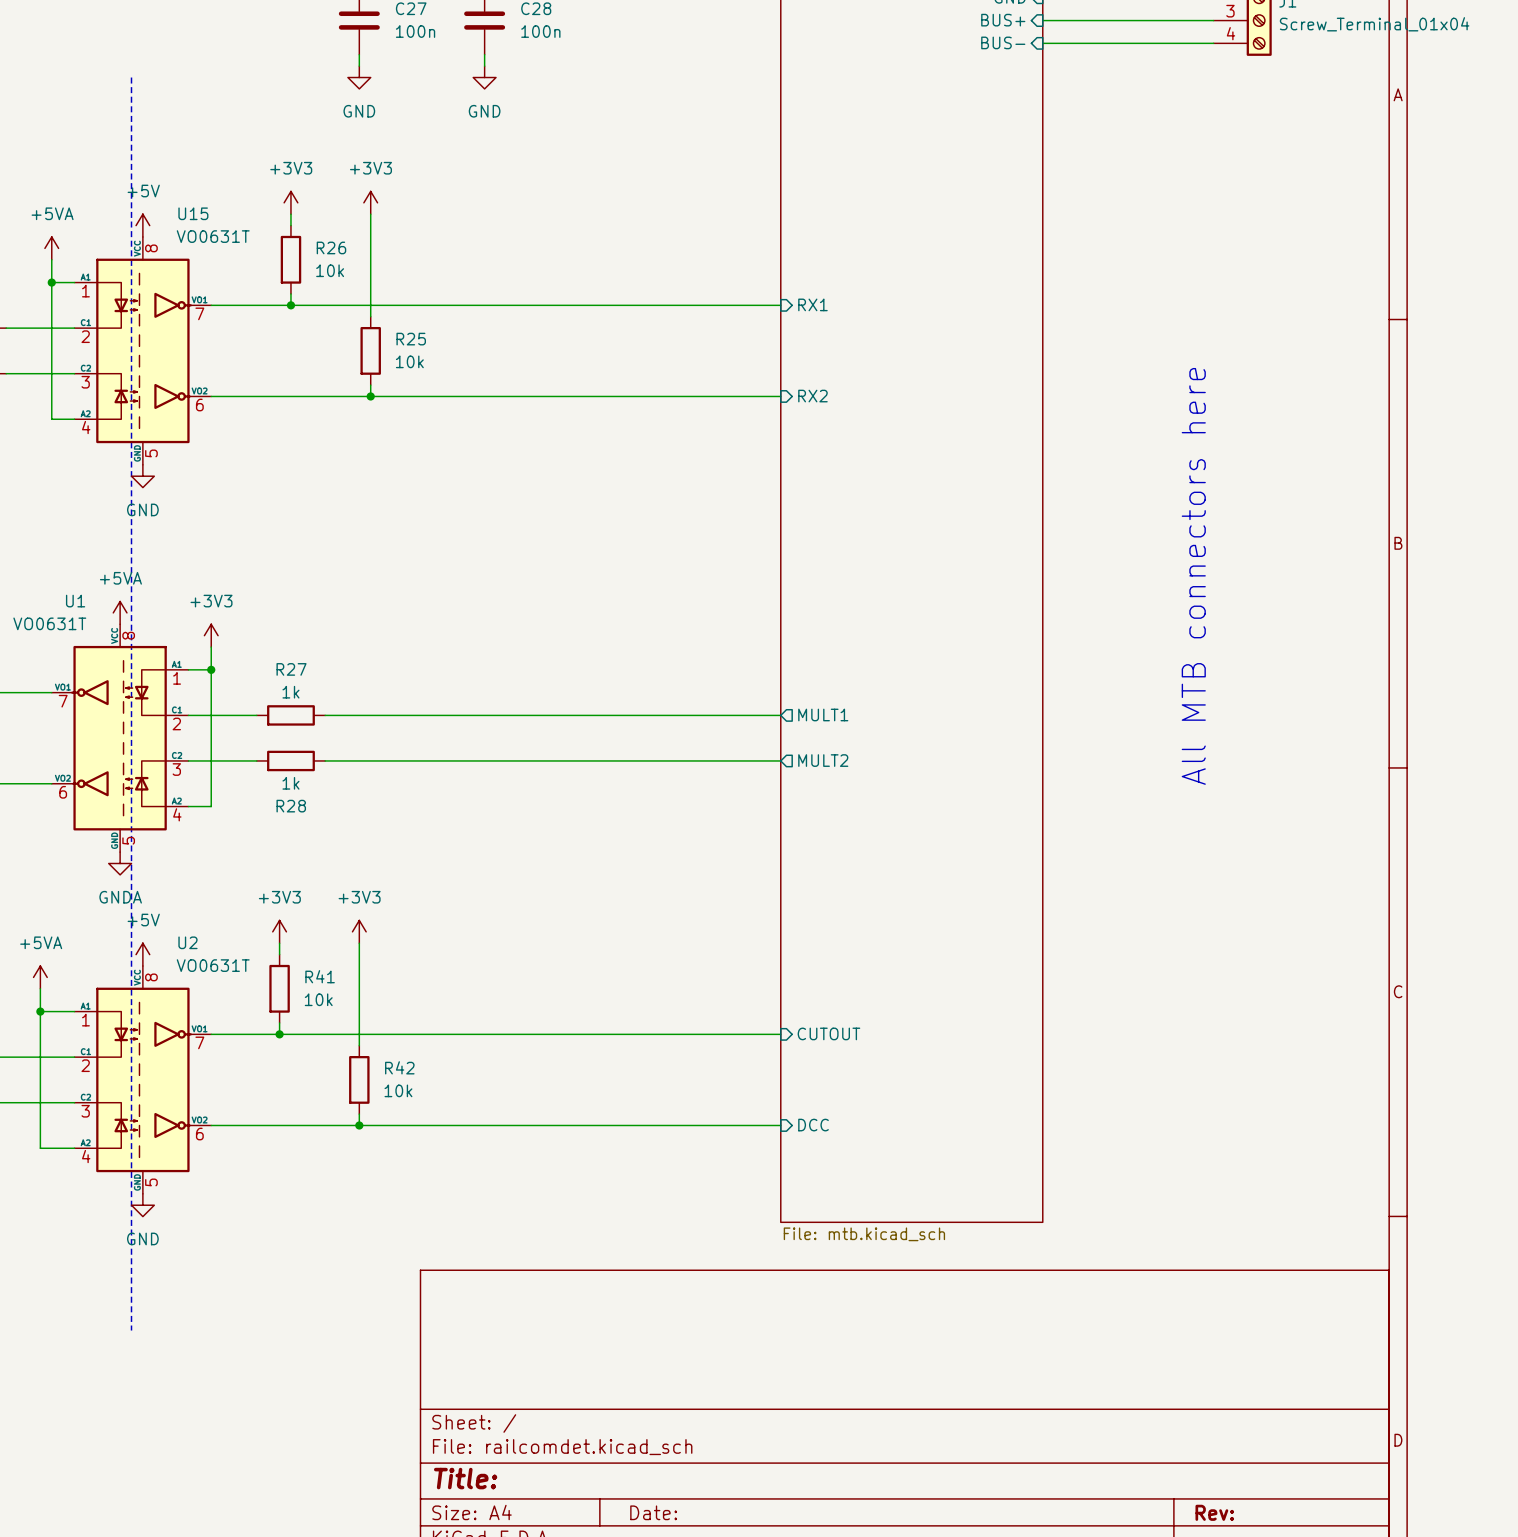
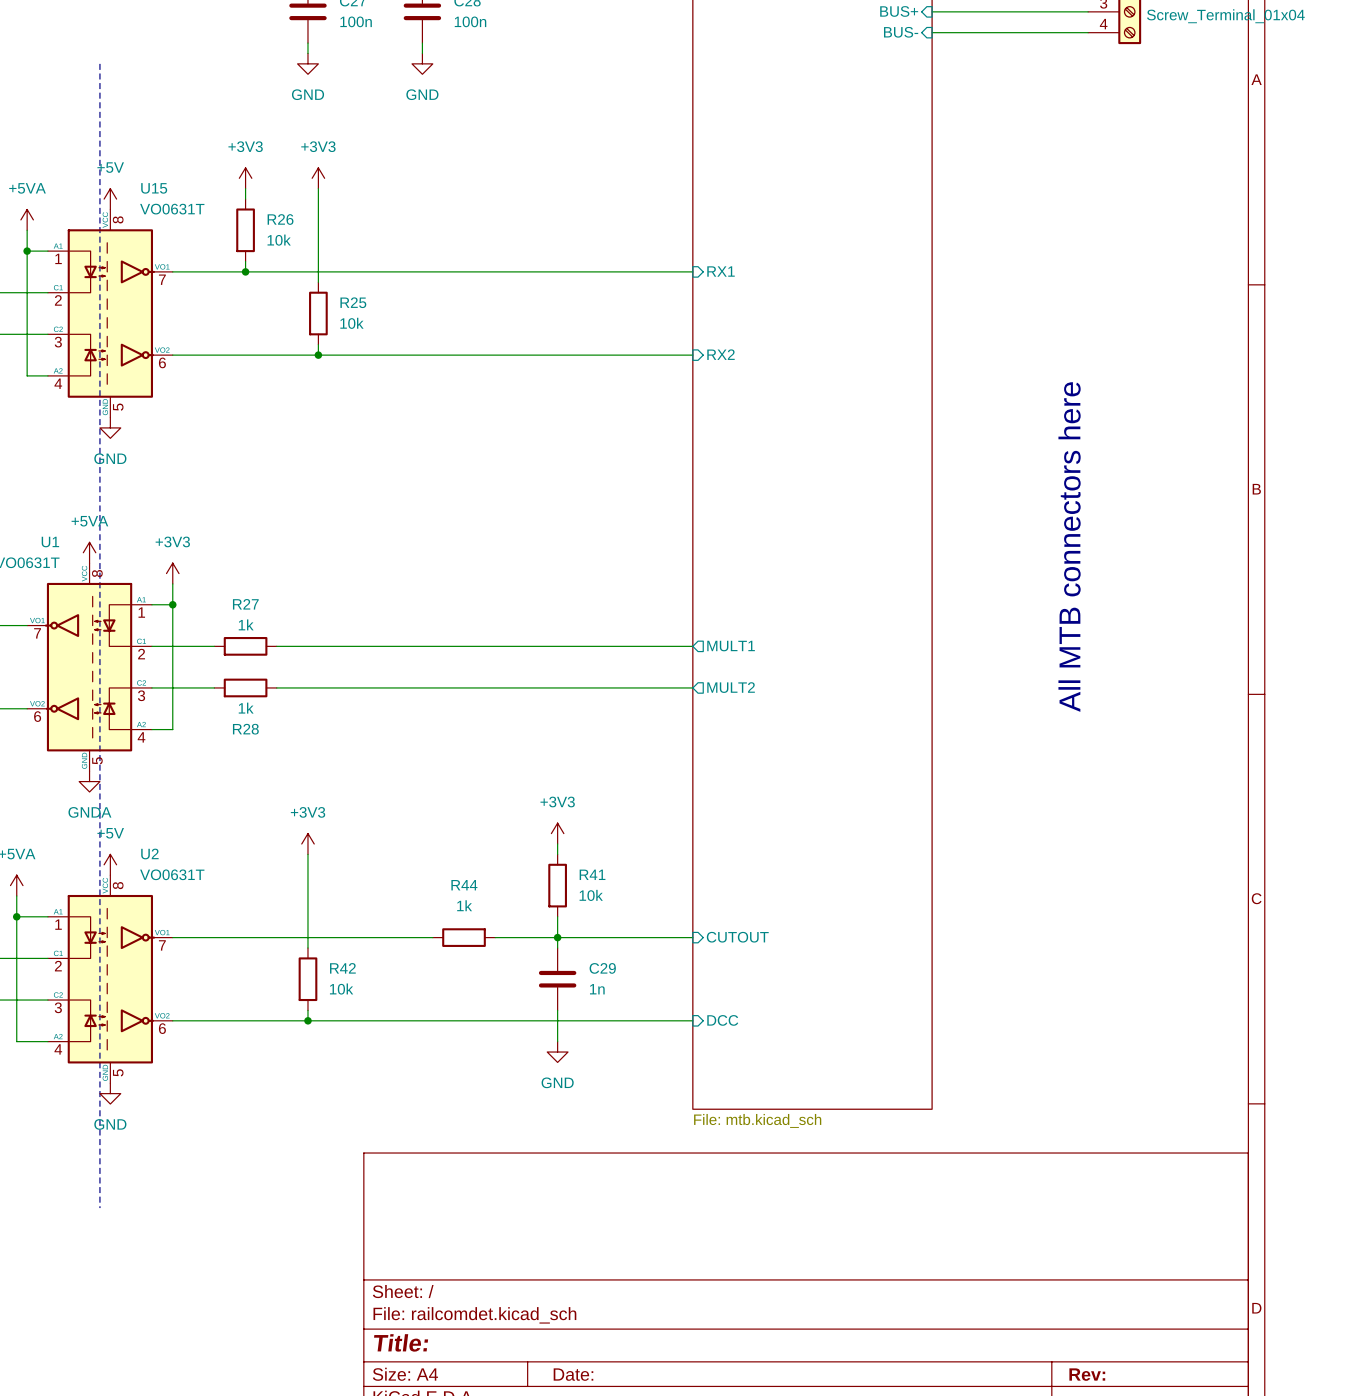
power symbol: none -> +3V3 (557, 833)
power symbol: +3V3 (279, 931) -> none
wire: none -> (557, 843) (557, 854)
wire: (279, 943) (279, 954) -> none
R41 position: (279, 988) -> (557, 885)
wire: none -> (557, 916) (557, 948)
wire: (279, 1022) (279, 1034) -> none
junction: (279, 1034) -> none
wire: (496, 1034) (564, 1034) -> none
R44: none -> 1k (464, 937)
junction: none -> (557, 937)
C29: none -> 1n (557, 979)
wire: none -> (557, 1010) (557, 1041)
power symbol: none -> GND (557, 1052)

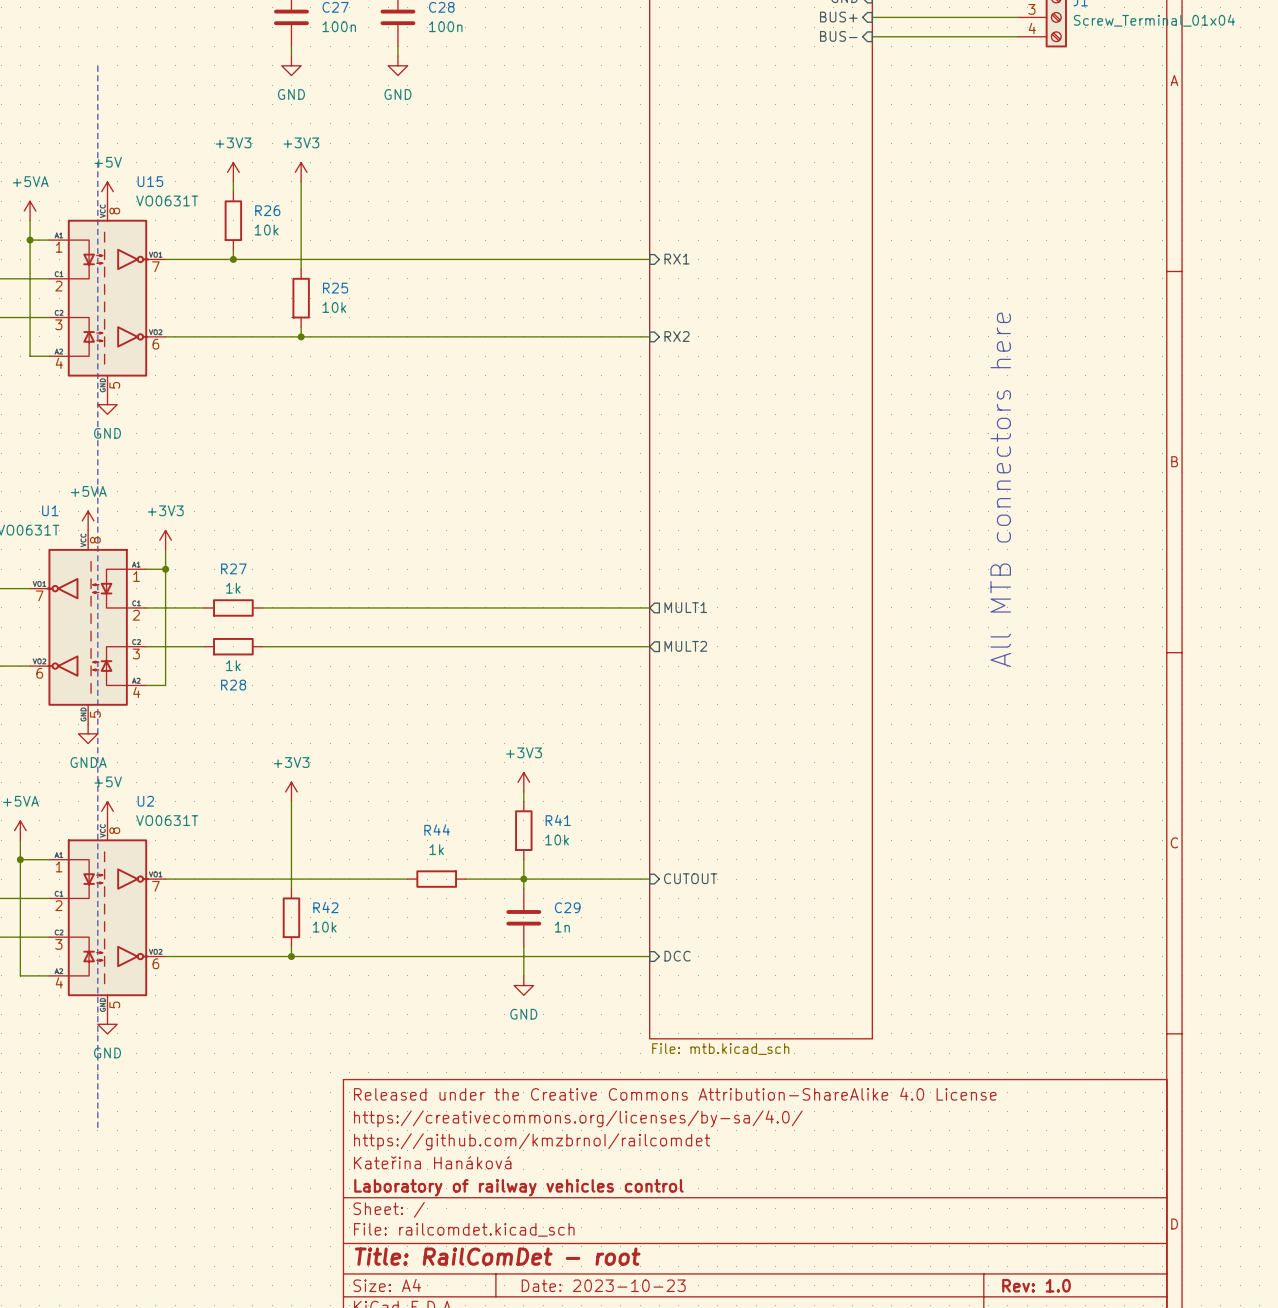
title block: none -> Released under the Creative Commons Attribution-ShareAlike 4.0 License (675, 1094)
title block: none -> https://creativecommons.org/licenses/by-sa/4.0/ (578, 1118)
title block: none -> https://github.com/kmzbrnoI/railcomdet (532, 1141)
title block: none -> Kateřina Hanáková (432, 1162)
title block: none -> Laboratory of railway vehicles control (518, 1187)
title block: Title: (401, 1342) -> Title: RailComDet - root (497, 1256)
title block: Date: (573, 1374) -> Date: 2023-10-23 (603, 1285)
title block: Rev: (1087, 1374) -> Rev: 1.0 (1036, 1285)

